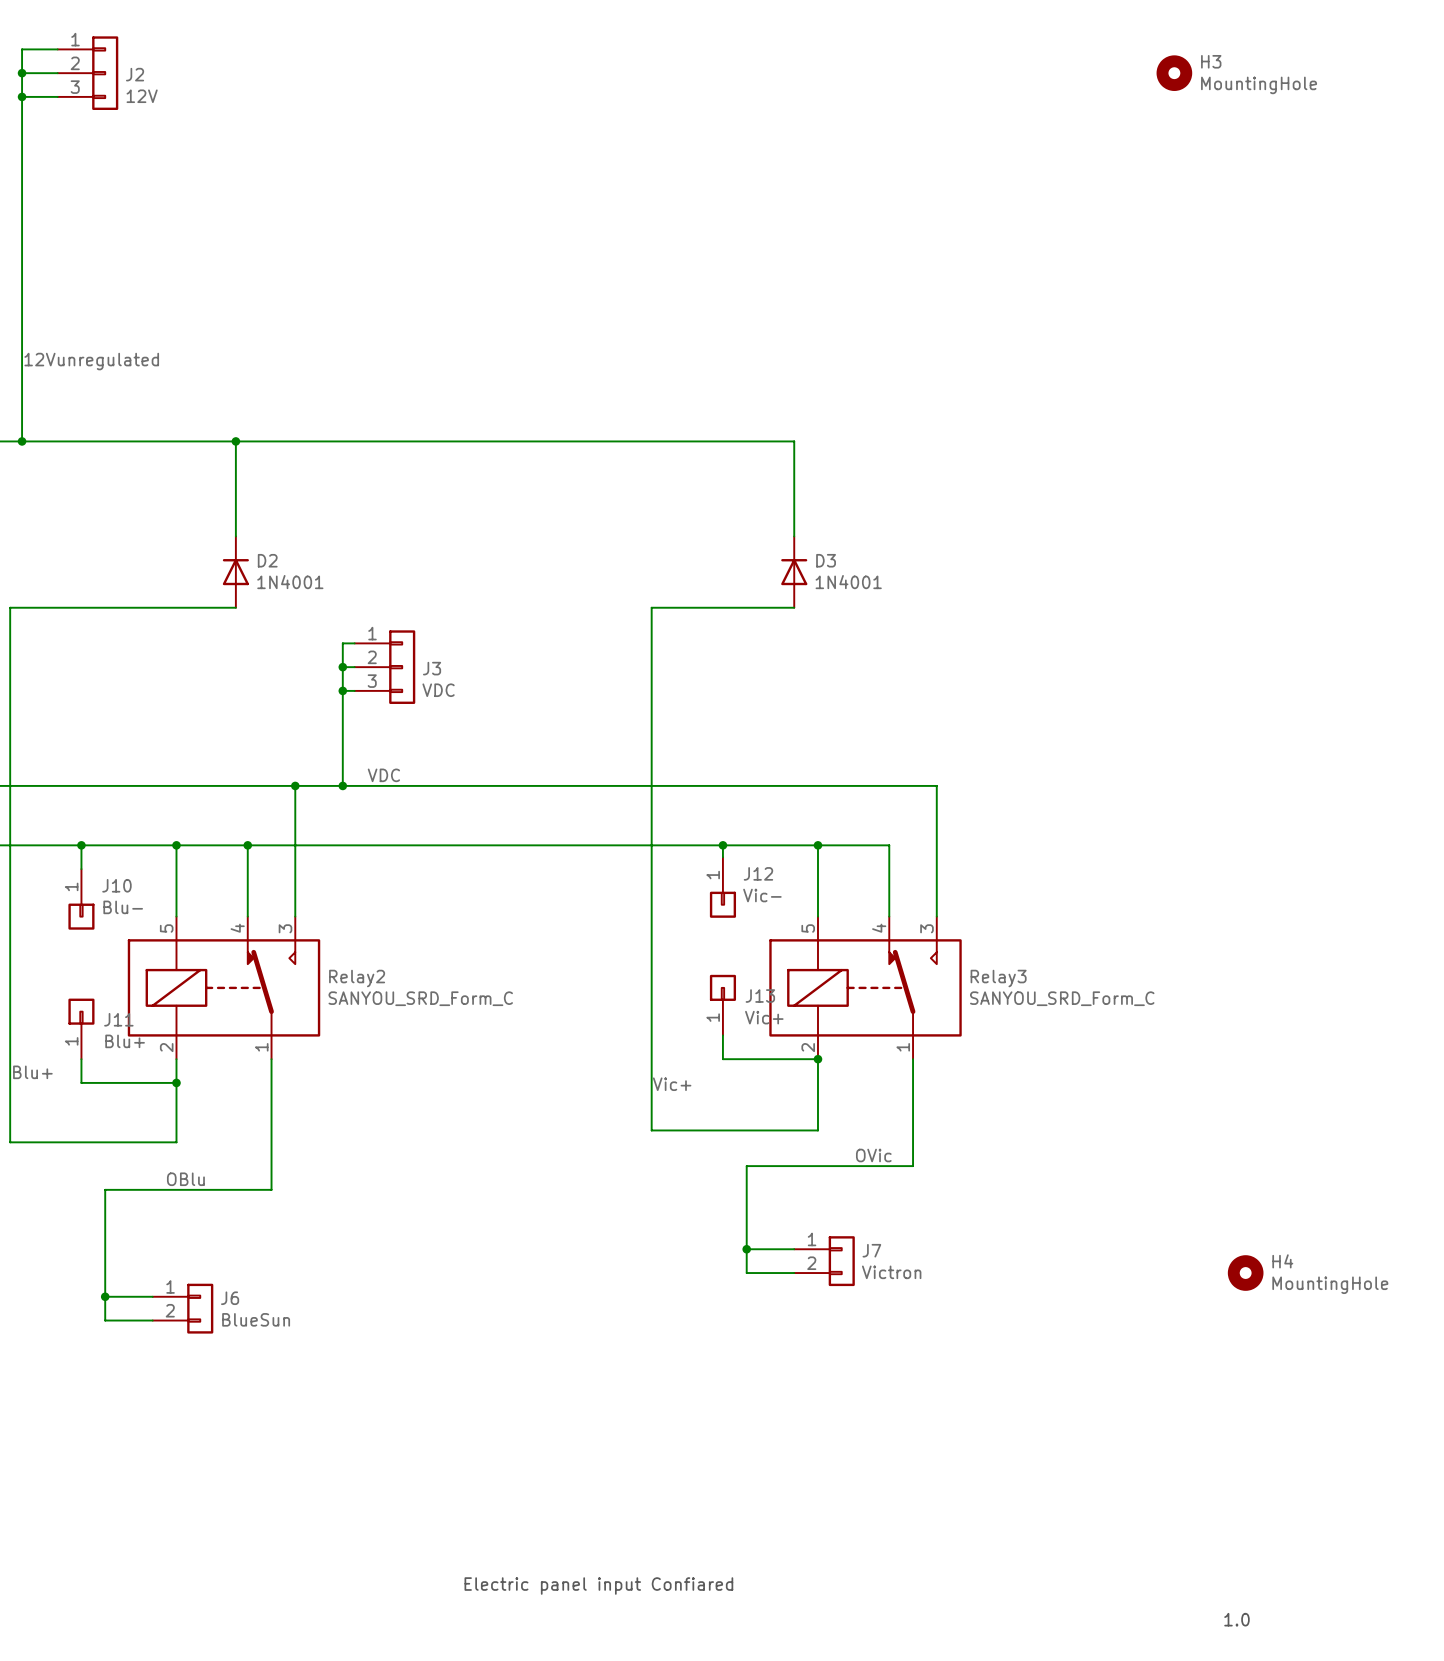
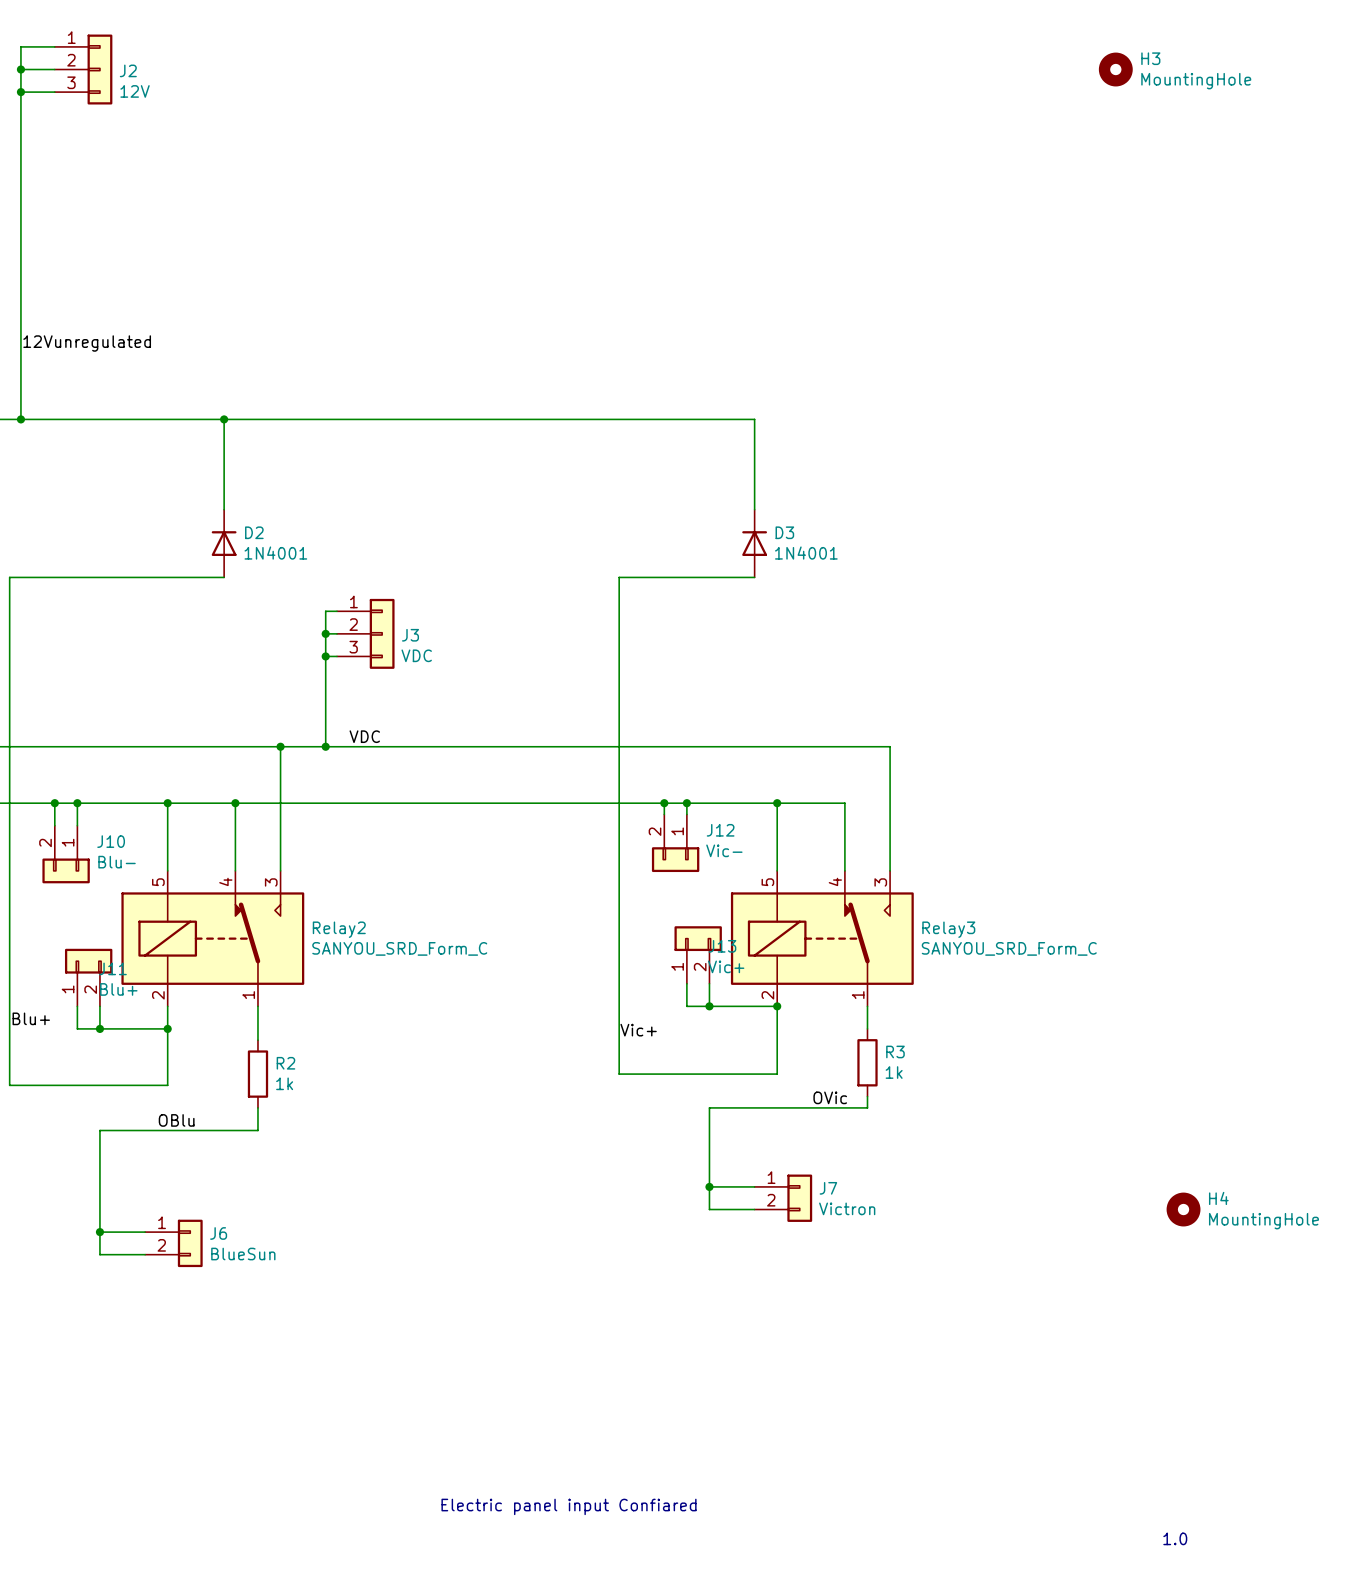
wire: none -> (54, 803) (54, 825)
junction: none -> (54, 803)
wire: none -> (664, 803) (664, 814)
junction: none -> (664, 803)
J12 symbol: [709, 857, 737, 918] -> [651, 814, 700, 873]
J10 symbol: [68, 869, 95, 930] -> [42, 825, 90, 884]
J13 symbol: [709, 974, 737, 1036] -> [674, 926, 722, 984]
J11 symbol: [68, 998, 95, 1060] -> [64, 948, 113, 1007]
wire: none -> (709, 983) (709, 1006)
wire: none -> (99, 1006) (99, 1028)
junction: none -> (709, 1006)
junction: none -> (99, 1028)
wire: (913, 1082) (913, 1154) -> none
wire: (271, 1094) (271, 1166) -> none
R3: none -> 1k (867, 1062)
R2: none -> 1k (257, 1074)

